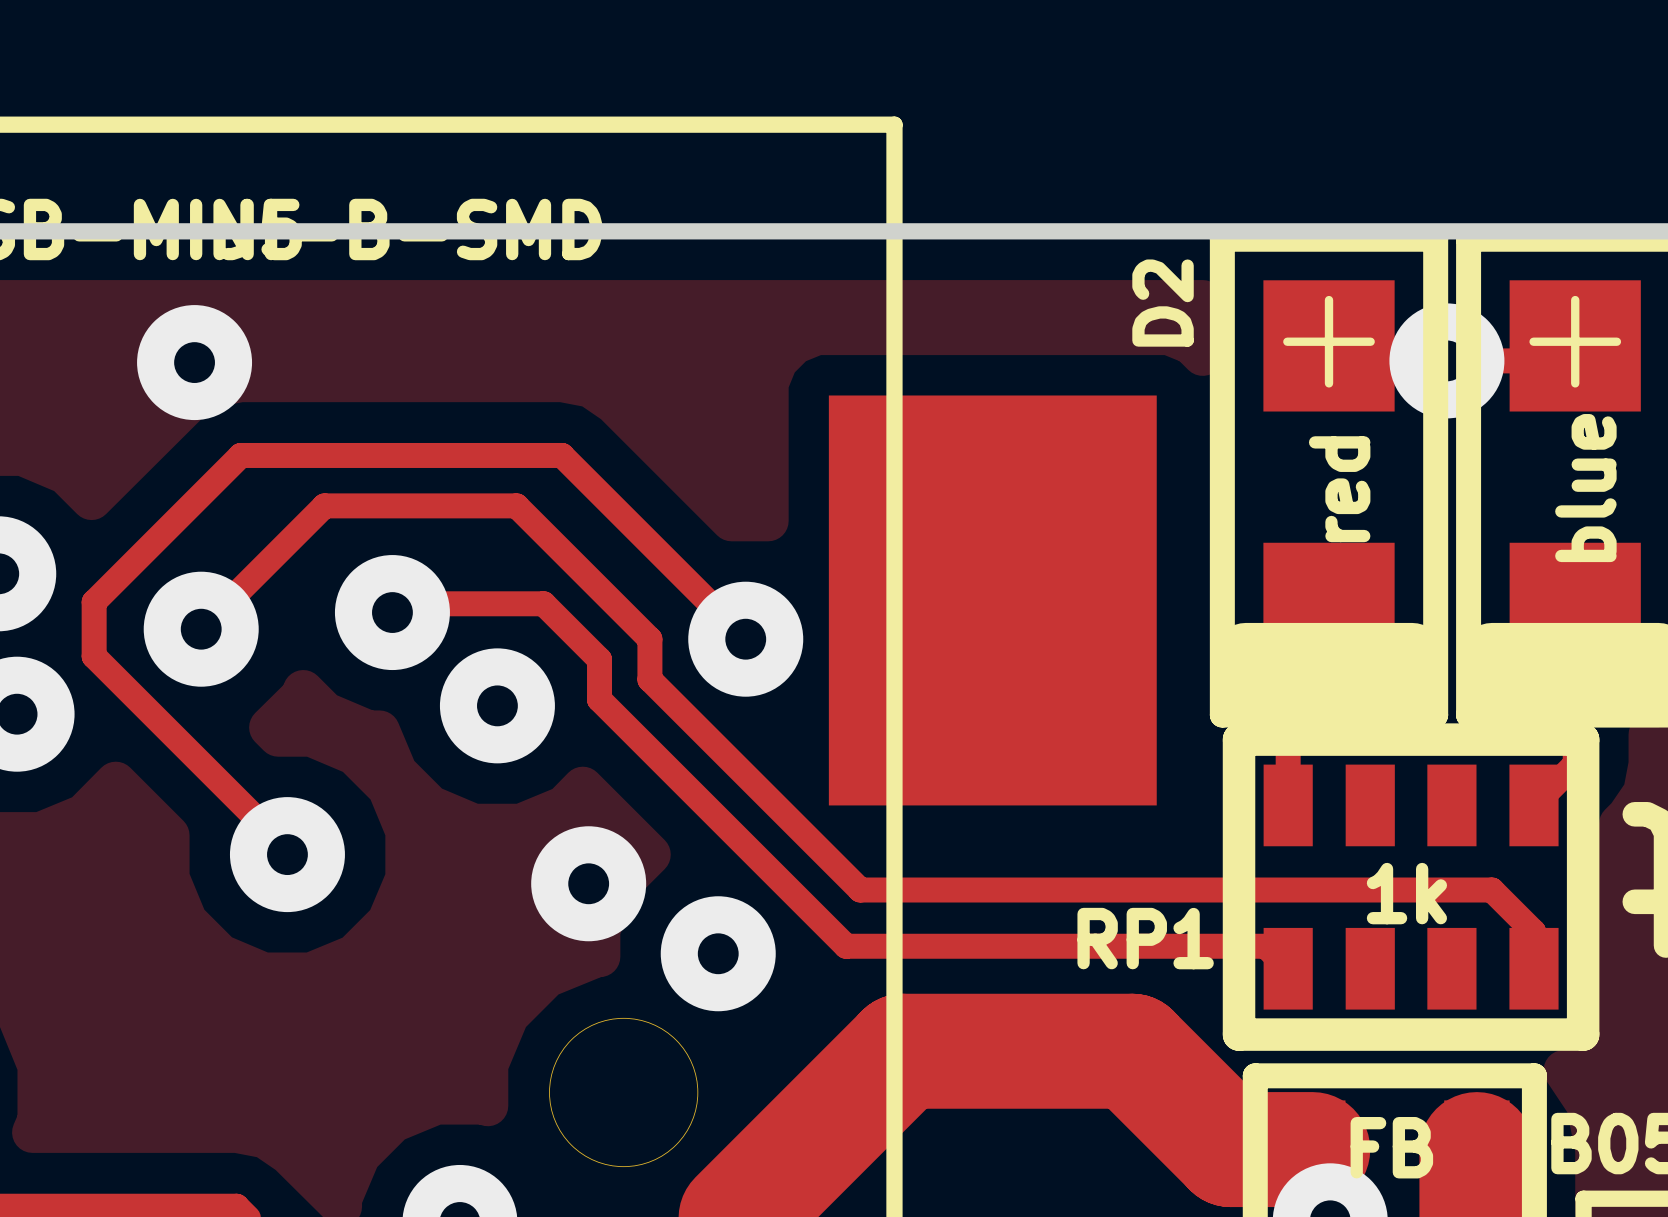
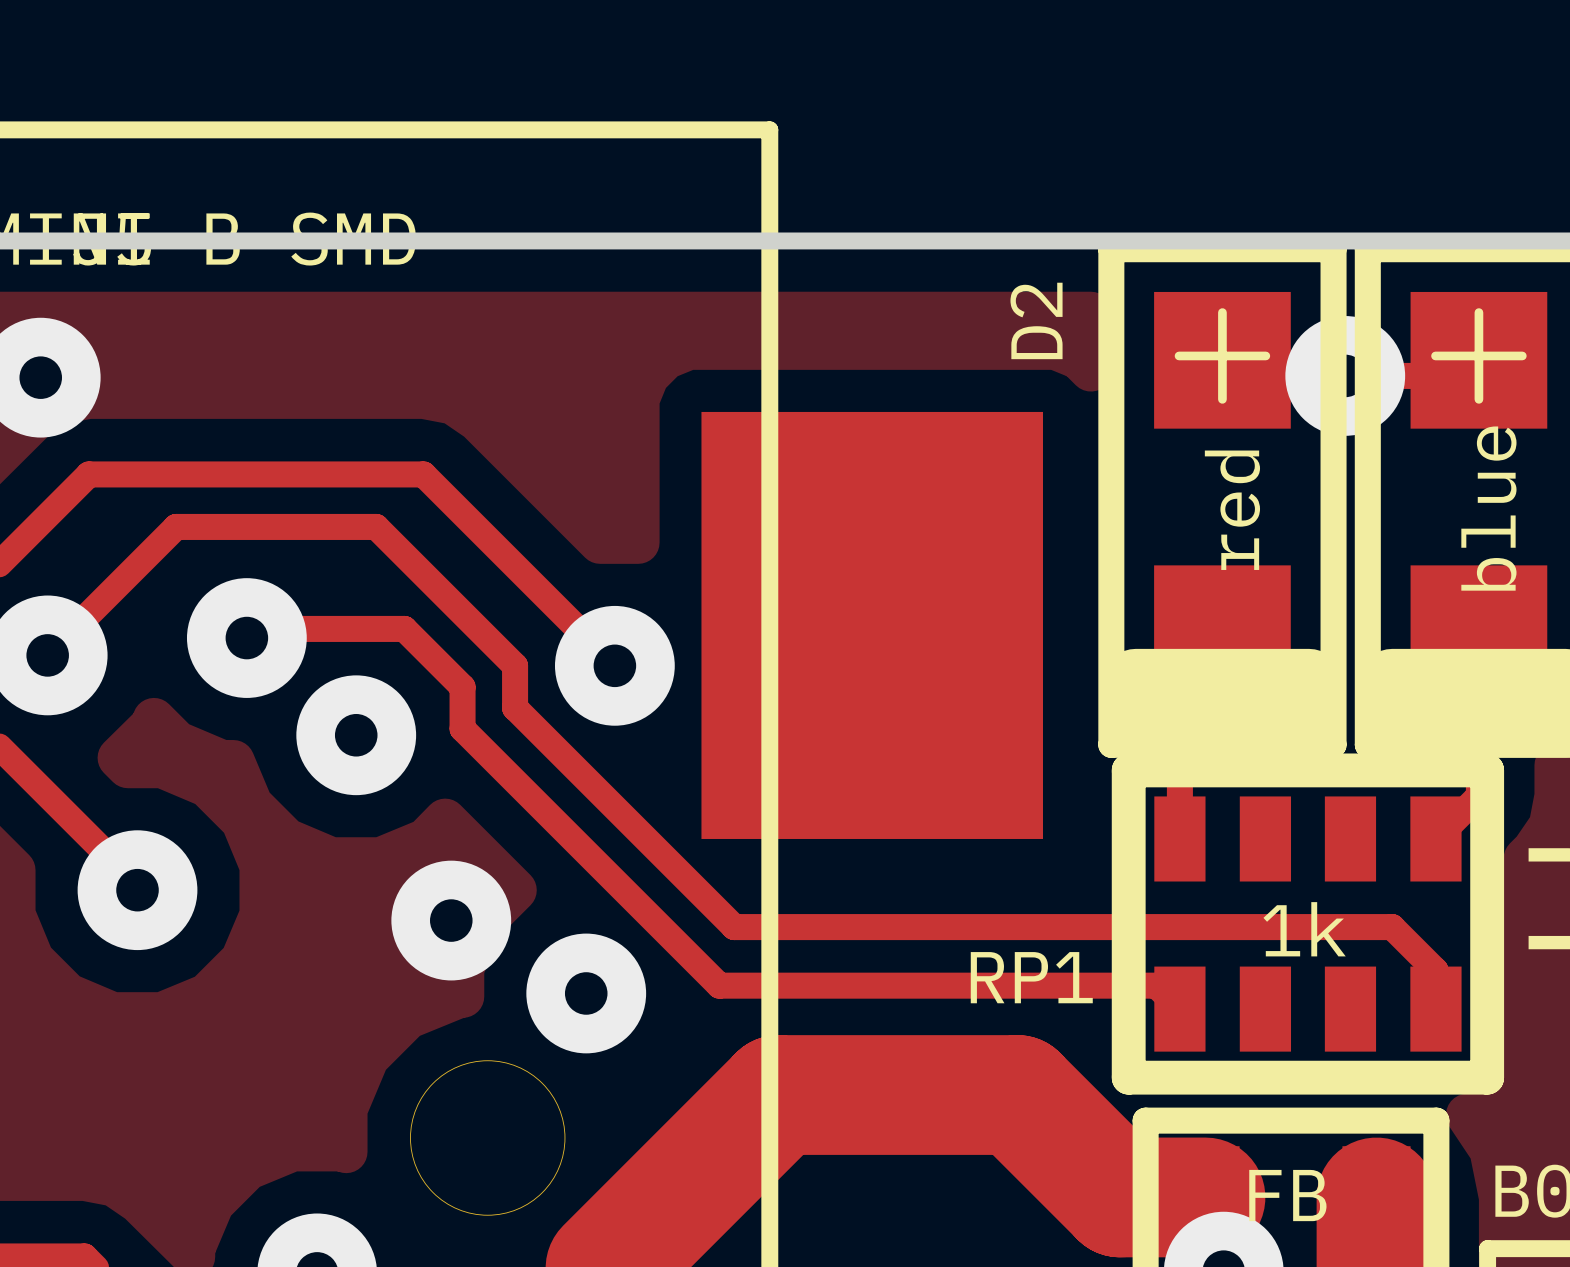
D2 name position: D2 (1163, 303) -> D2 (1036, 320)

